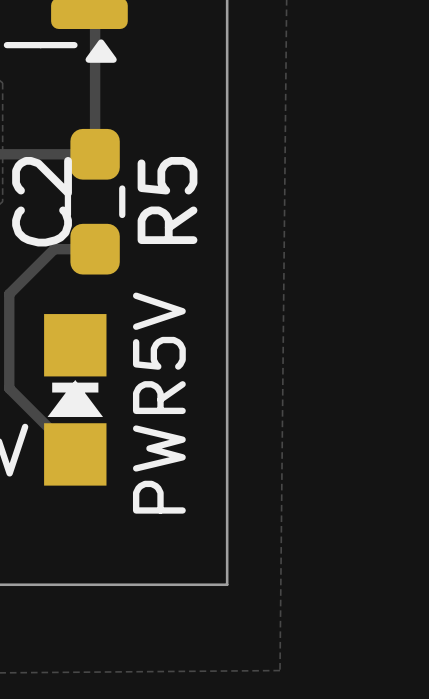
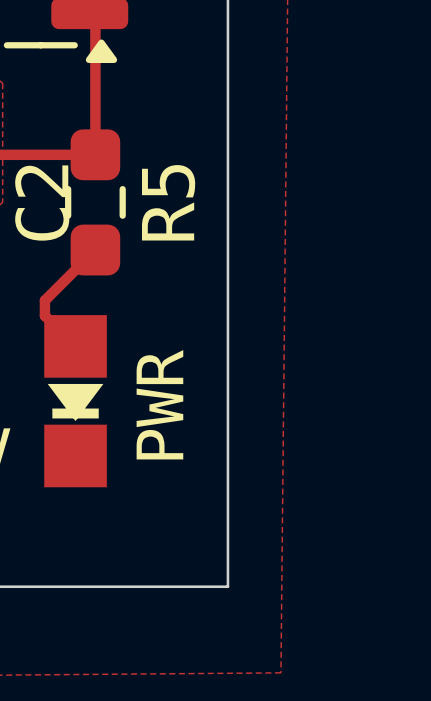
track: (95, 249) (54, 249) (9, 294) (9, 388) (75, 454) -> (95, 250) (44, 300) (44, 315) (75, 346)
part rotation: 0° (75, 399) -> 180° (75, 401)
text: PWR5V (159, 403) -> PWR (159, 404)

